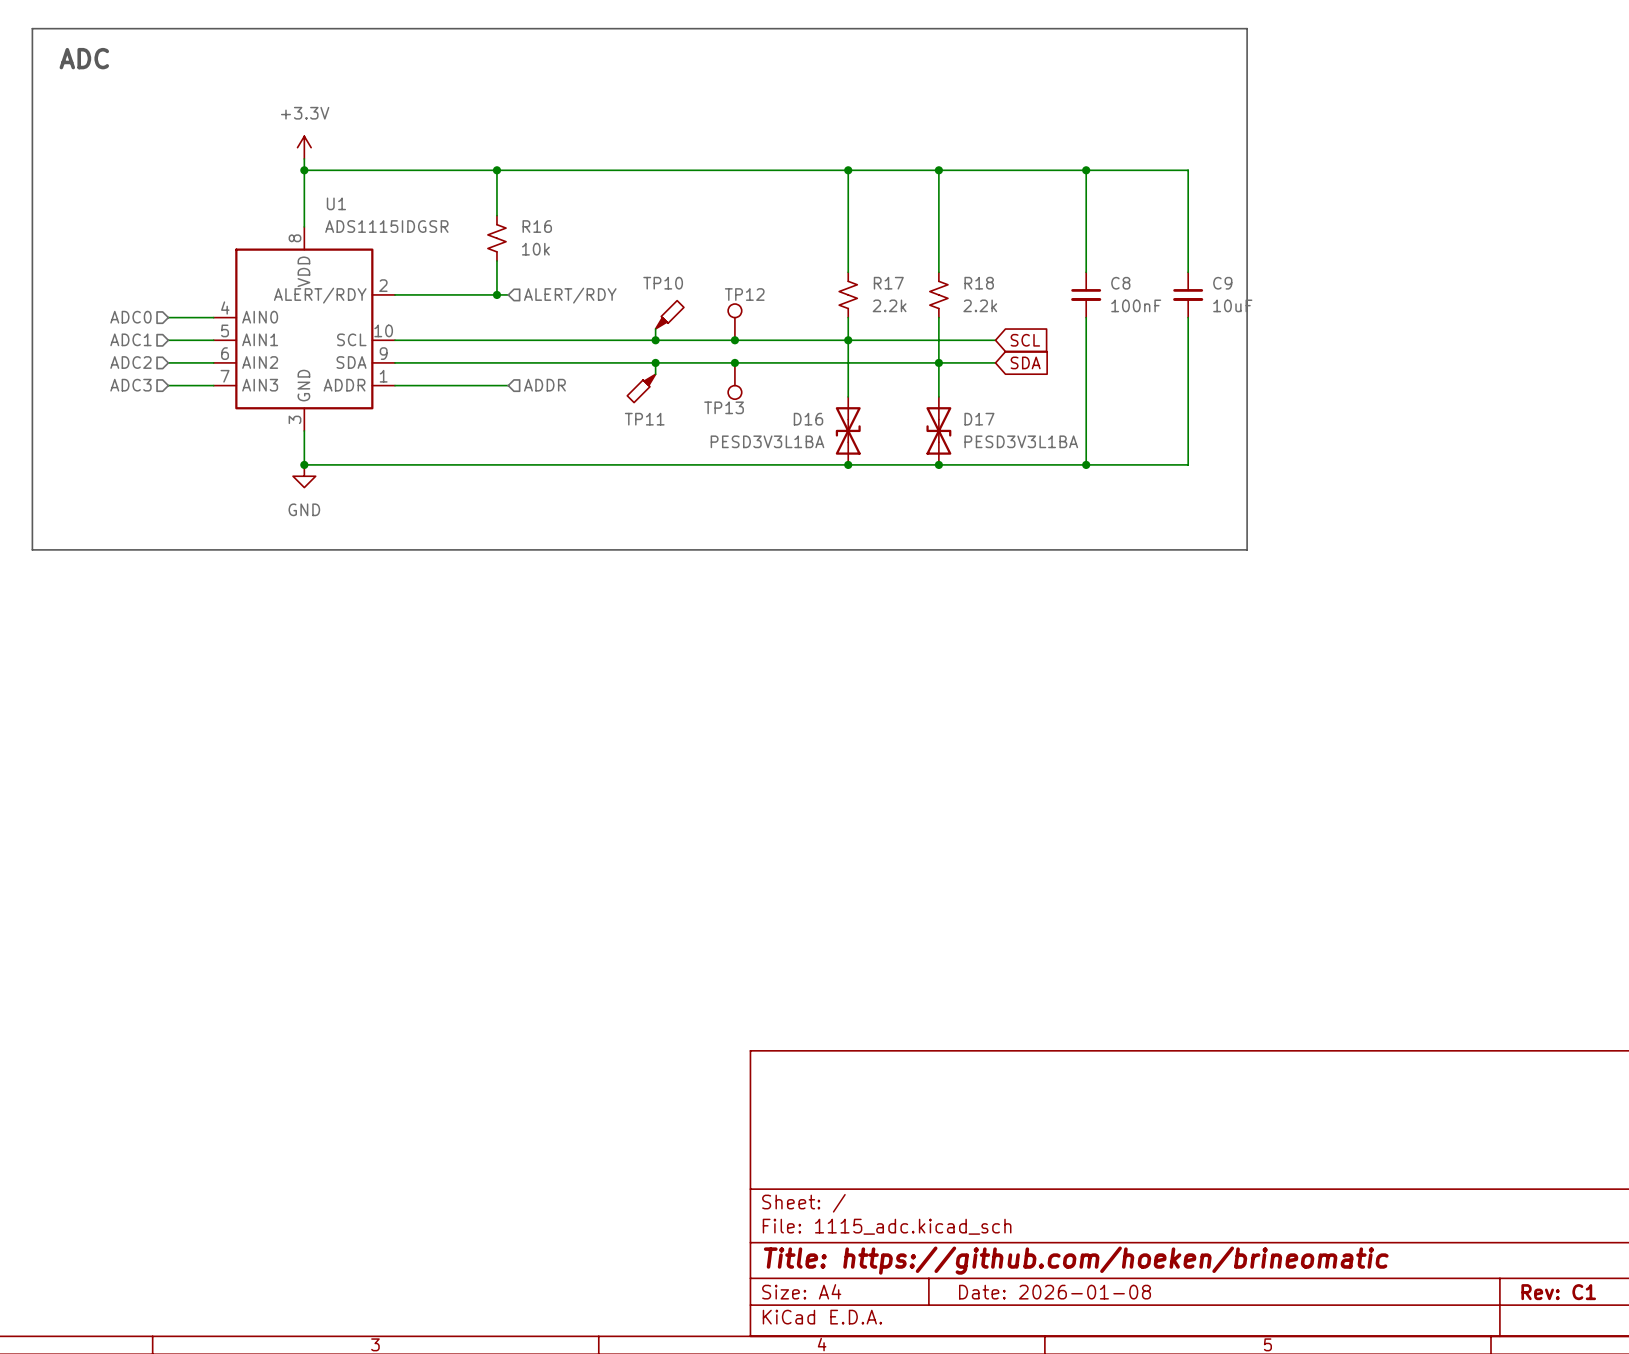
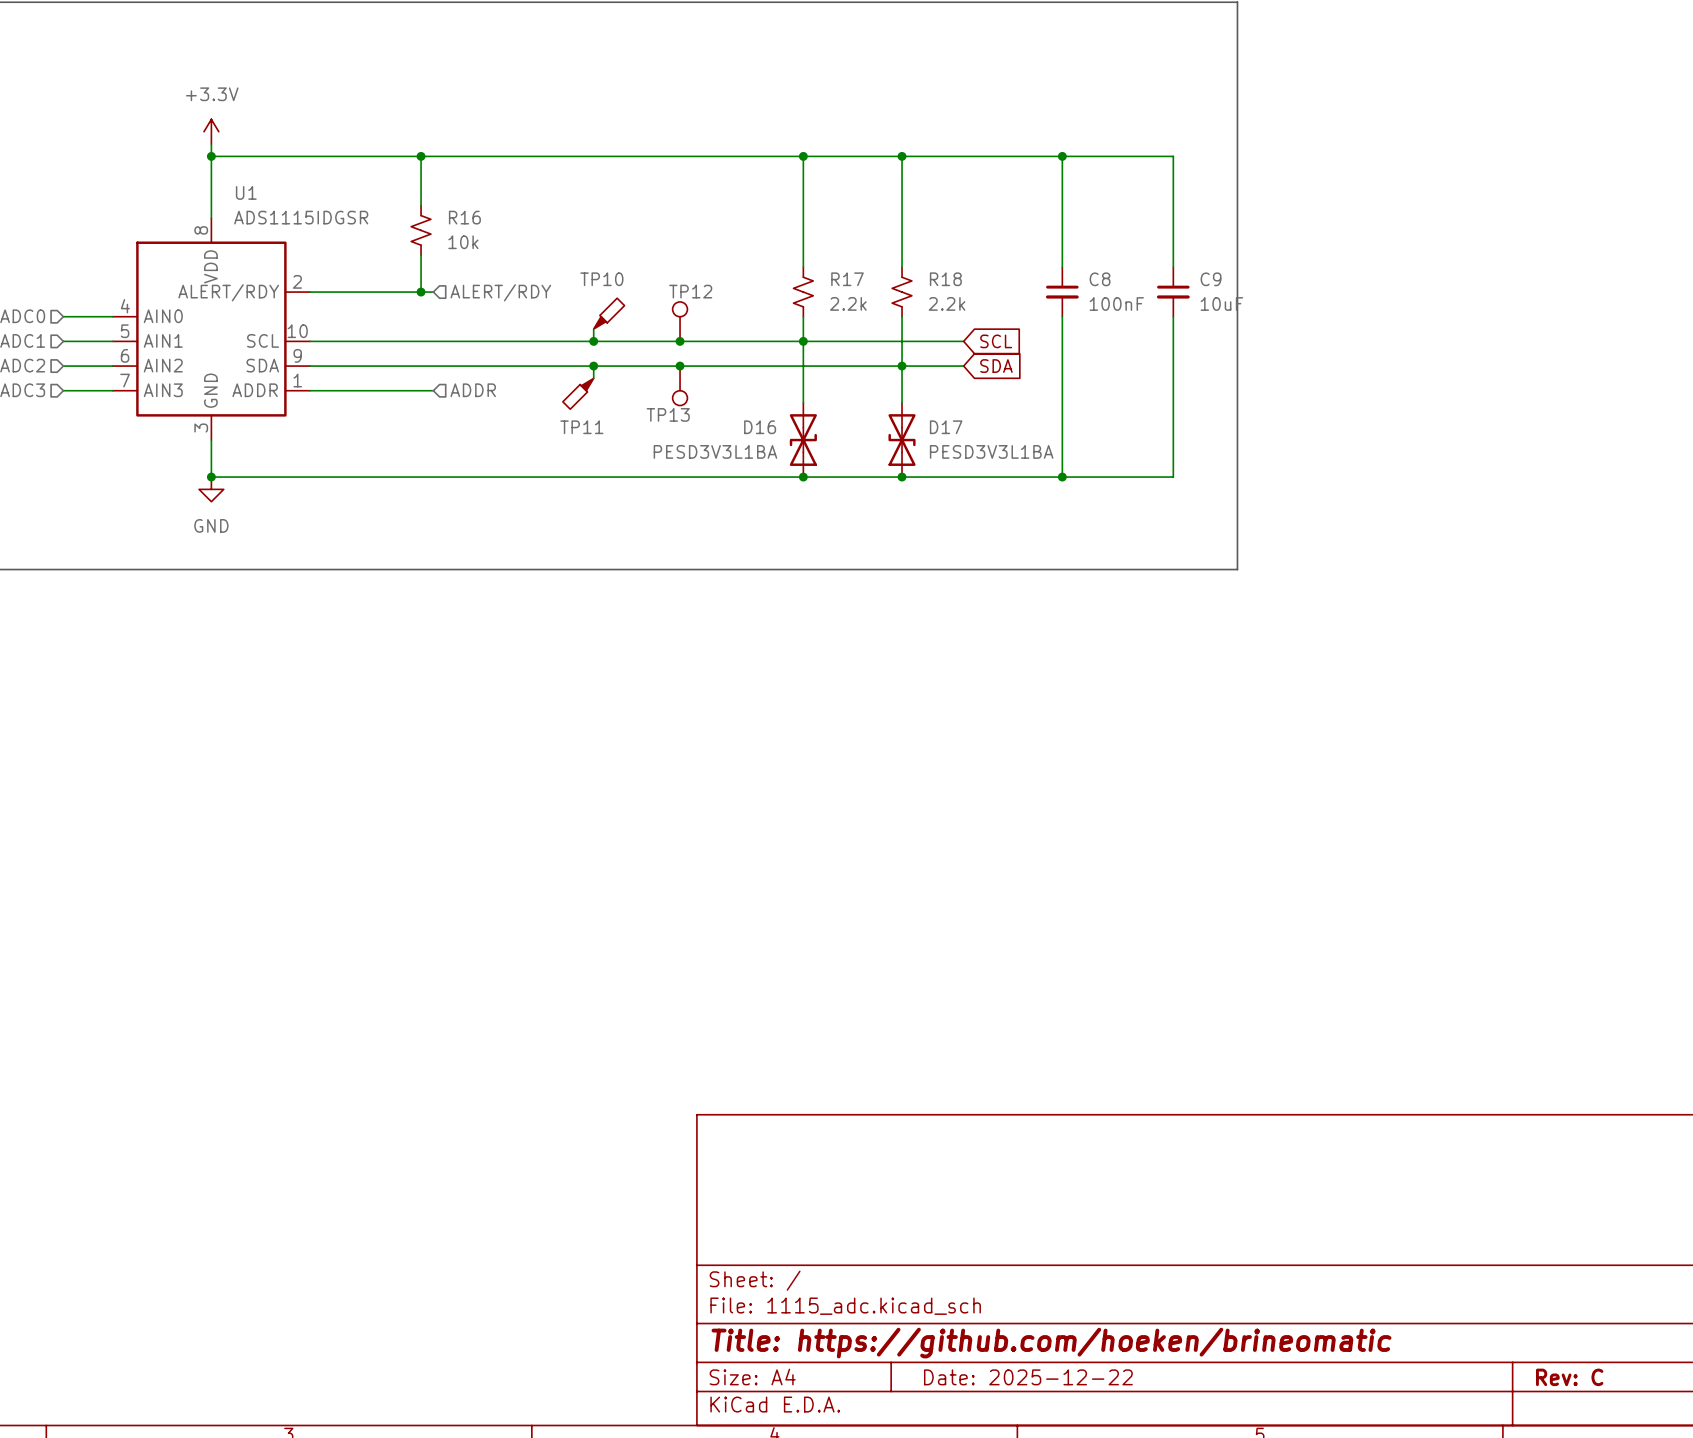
title block: Date: 2026-01-08 (1055, 1292) -> Date: 2025-12-22 (1028, 1377)
title block: Rev: C1 (1558, 1292) -> Rev: C (1569, 1377)

